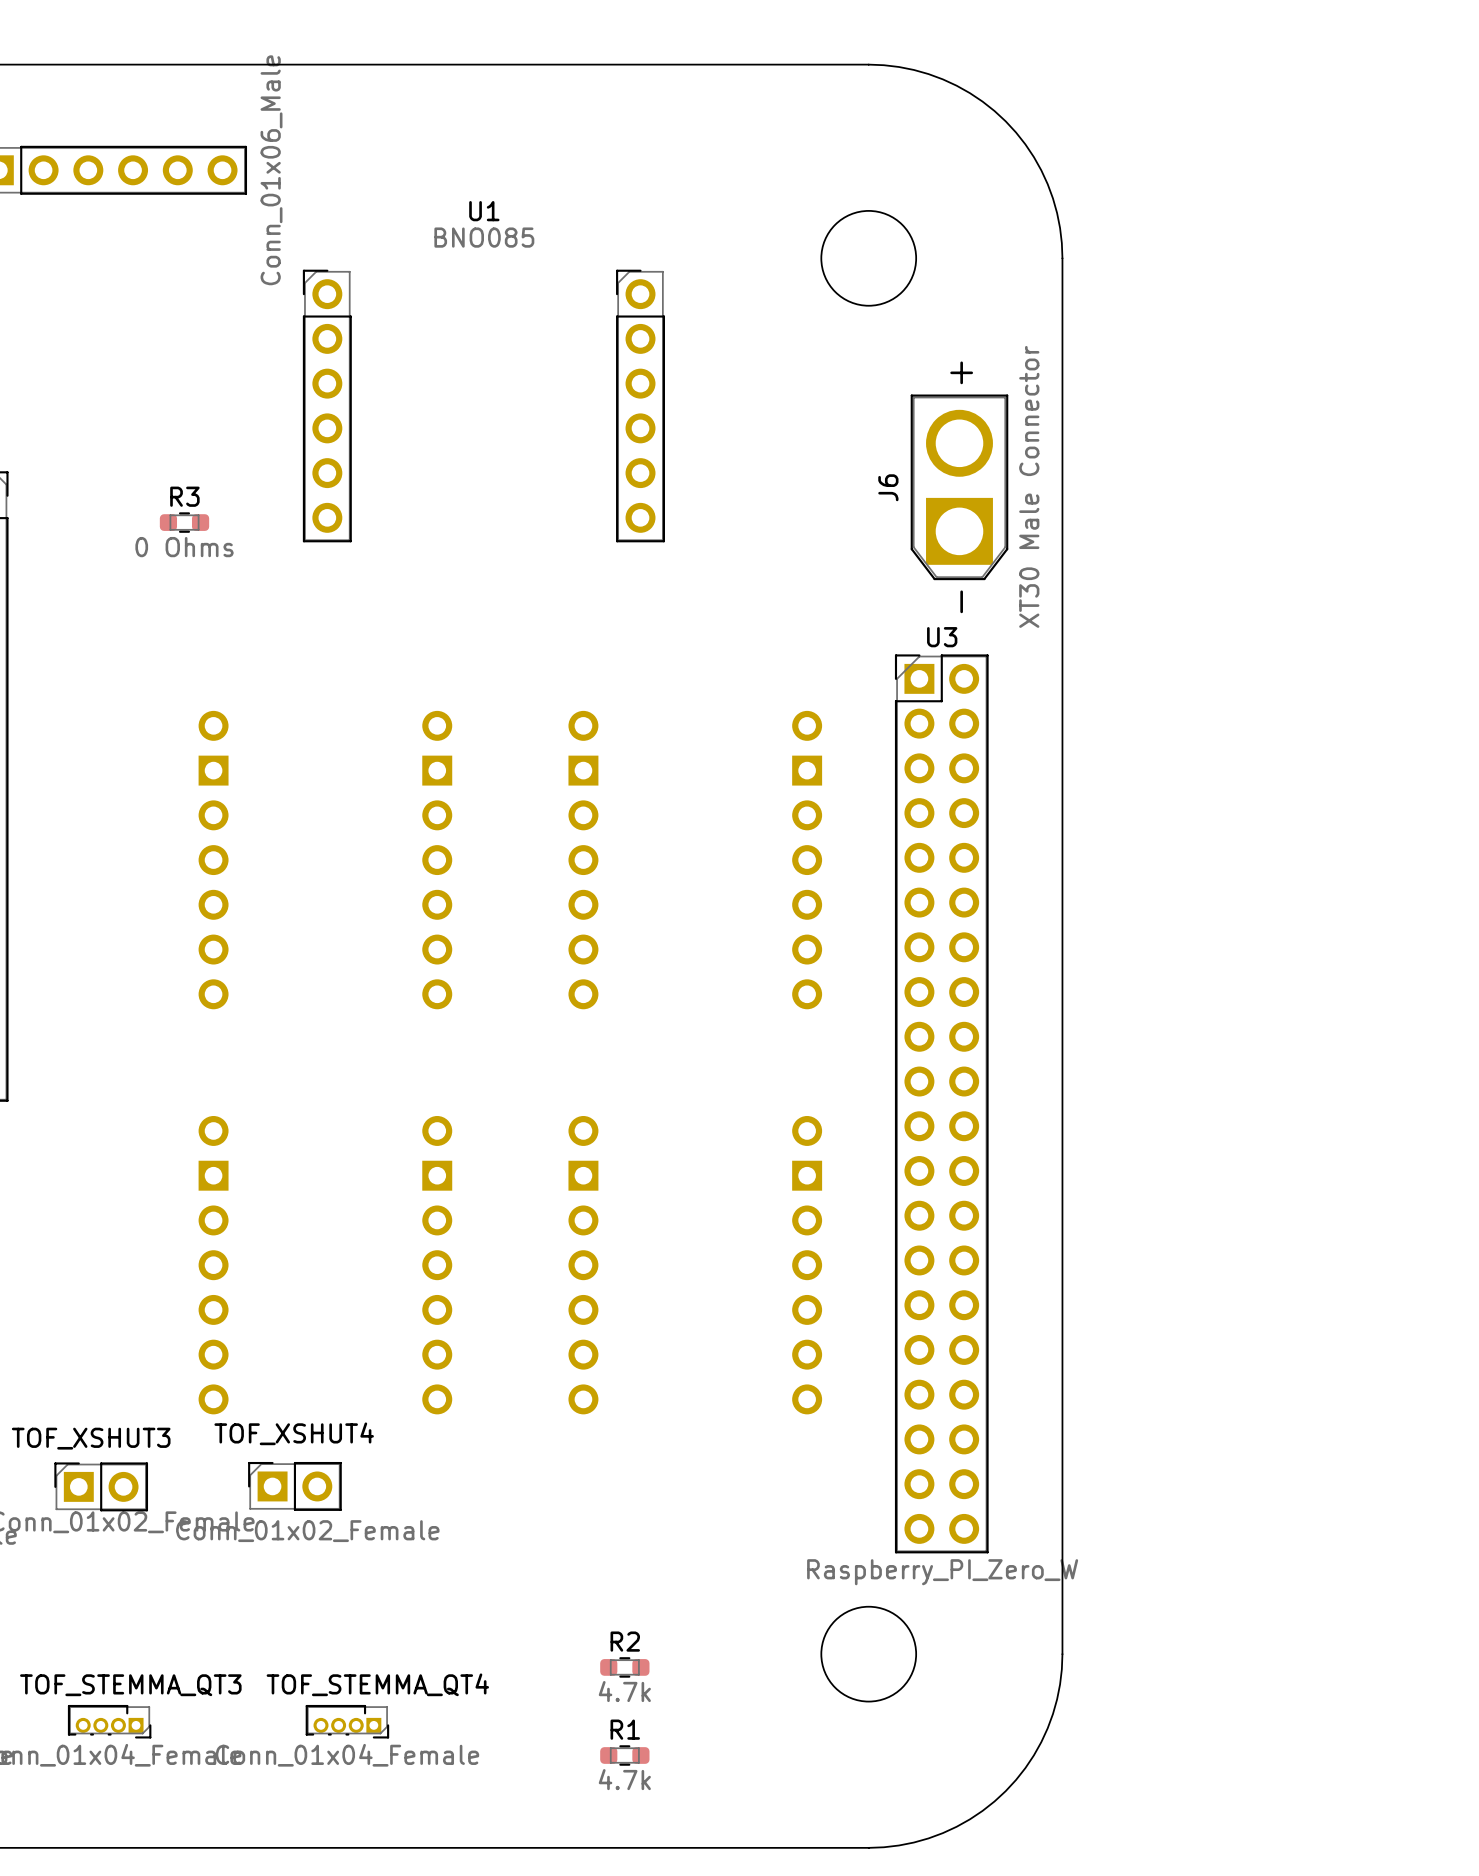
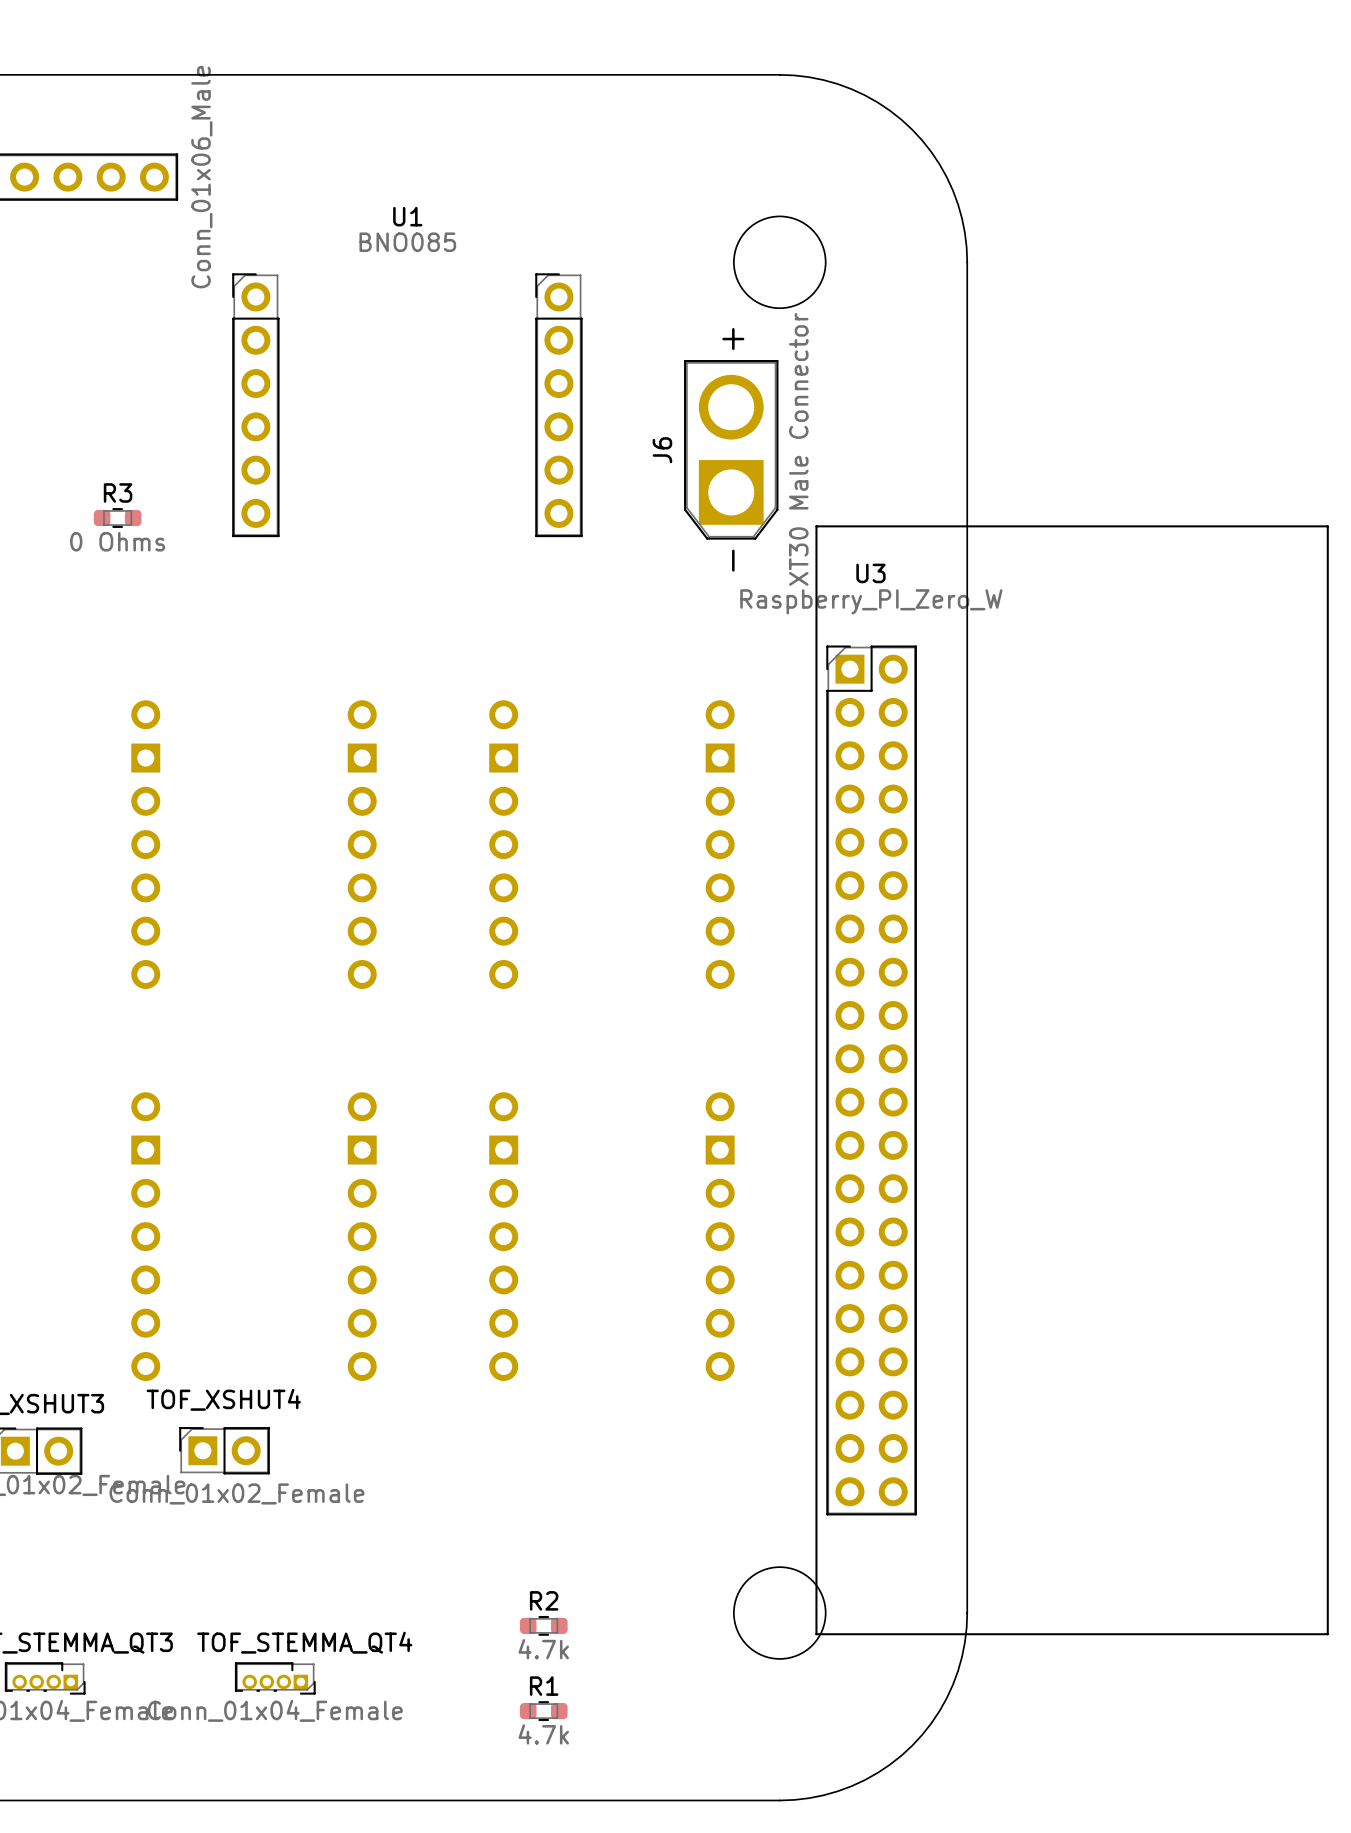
J6 position: (959, 487) -> (731, 449)
U3 name position: U3 (942, 637) -> U3 (870, 573)
U3 footprint: [894, 654, 989, 1554] -> [815, 525, 1329, 1636]
U3 value position: Raspberry_PI_Zero_W (942, 1572) -> Raspberry_PI_Zero_W (871, 601)

